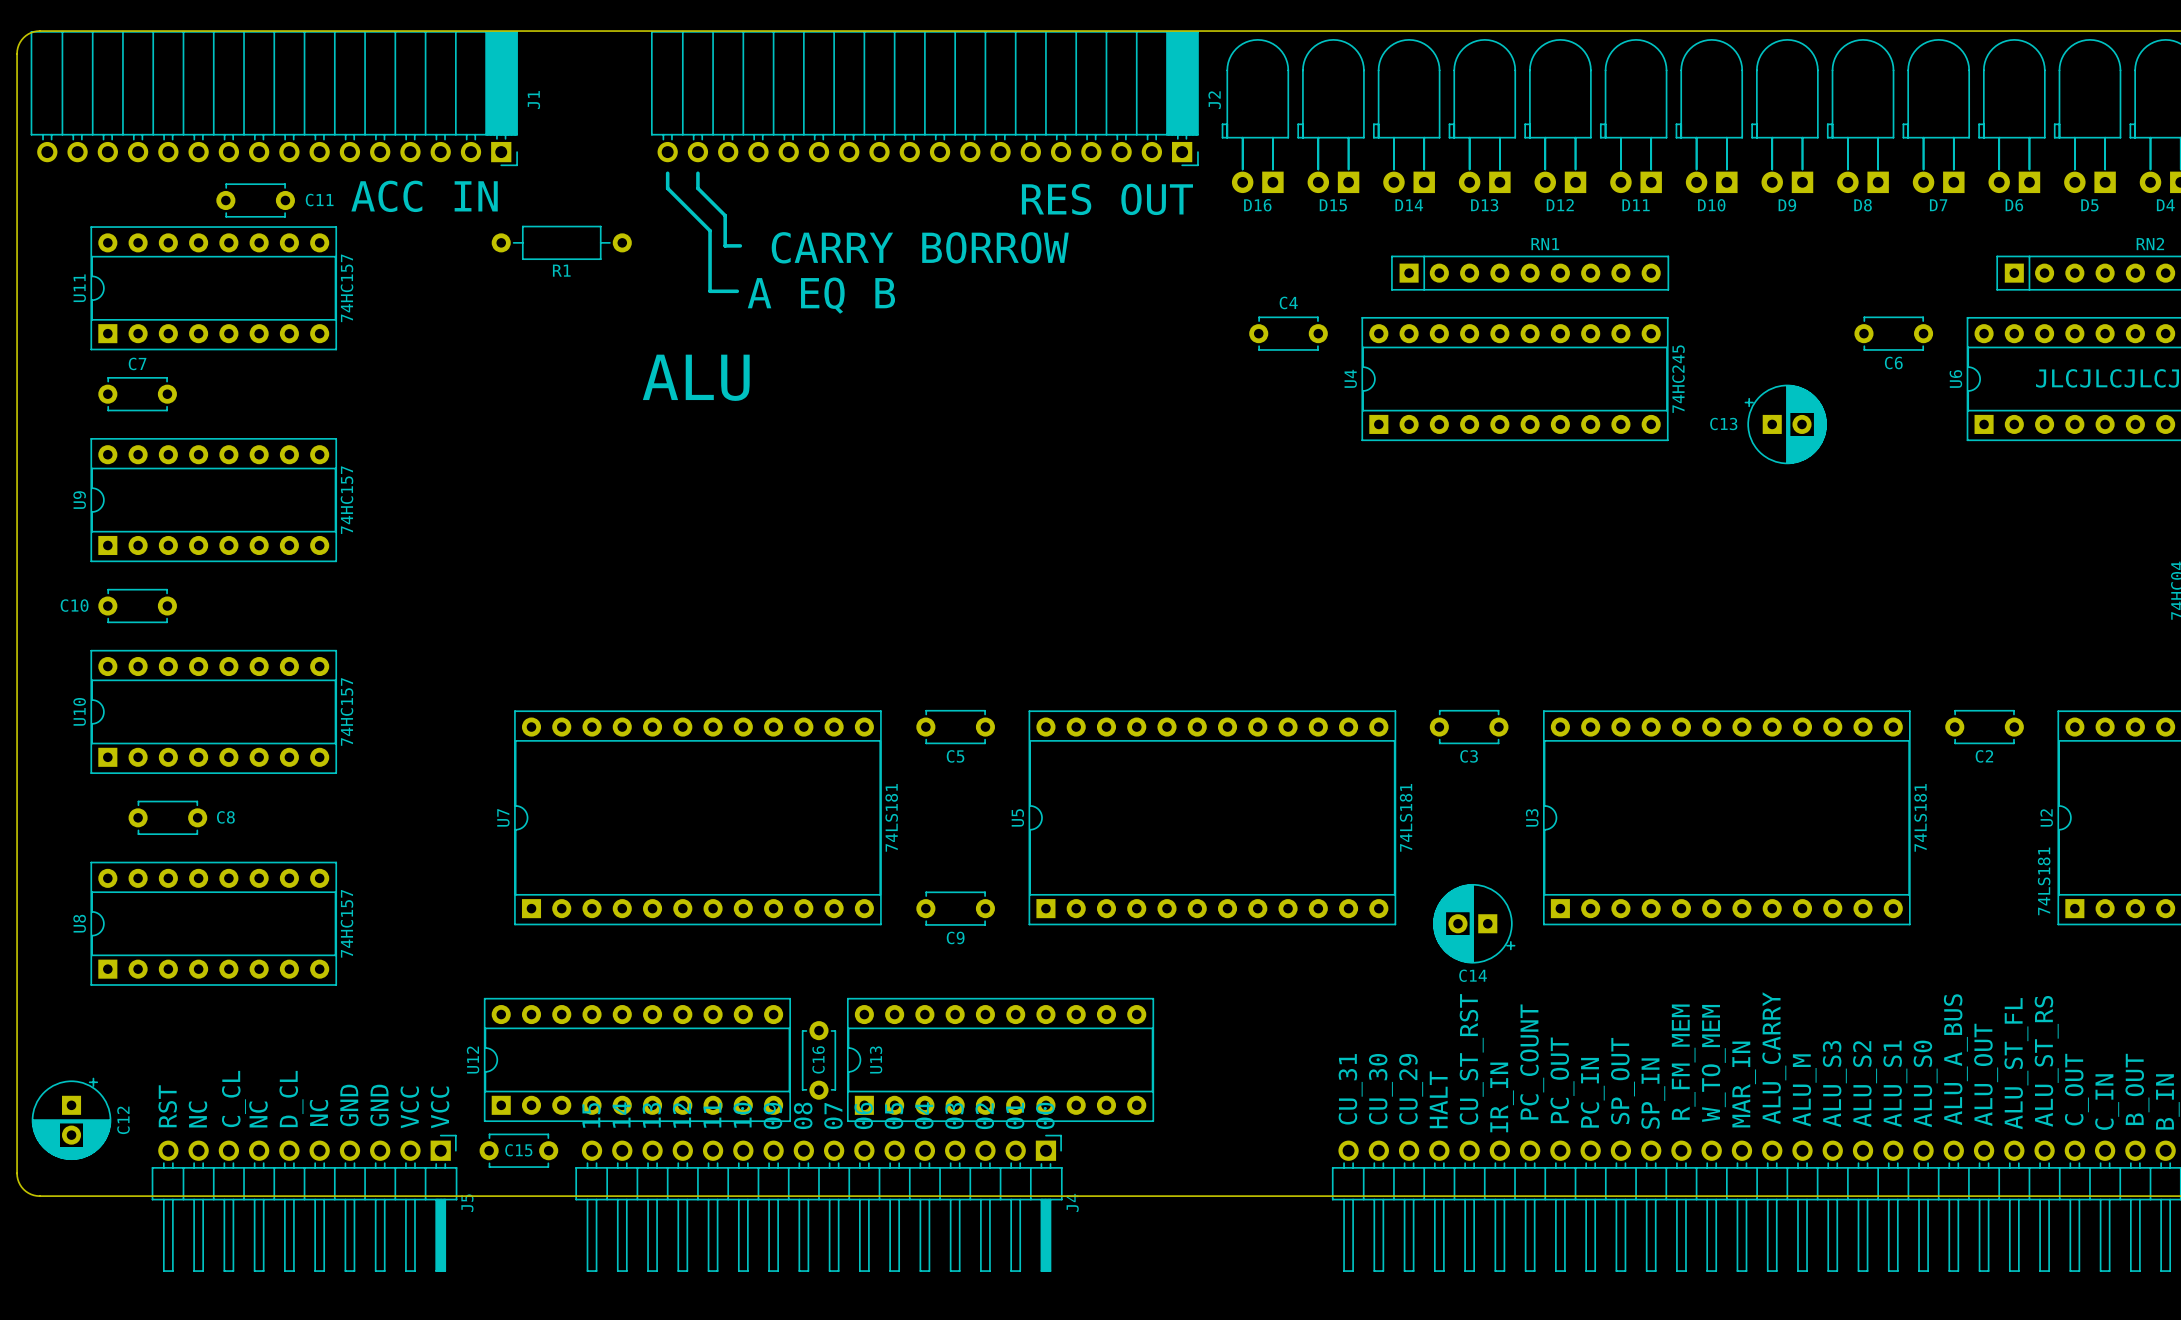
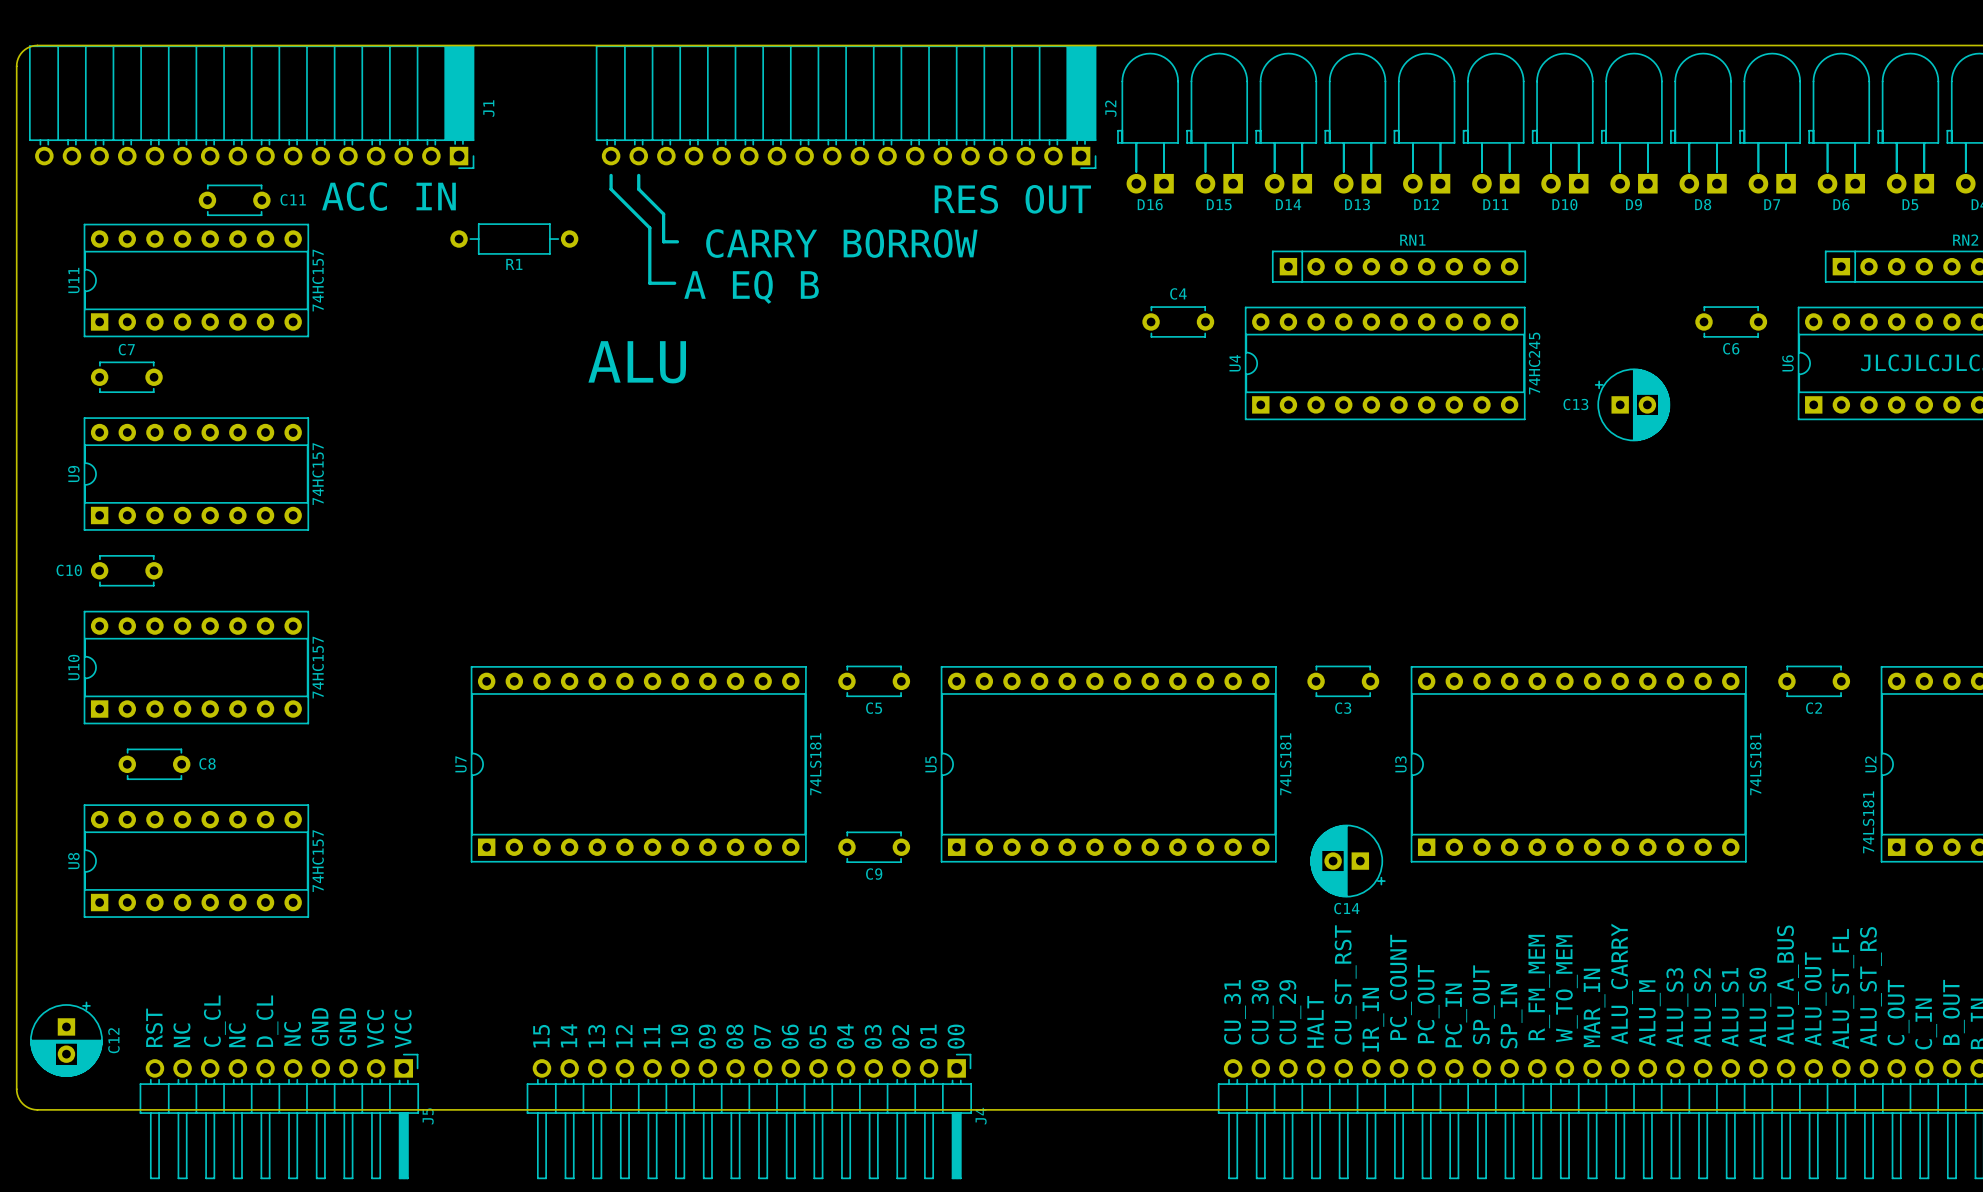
U12: (637, 1059) -> none
U13: (1000, 1059) -> none
C16: (818, 1060) -> none
C15: (518, 1150) -> none

